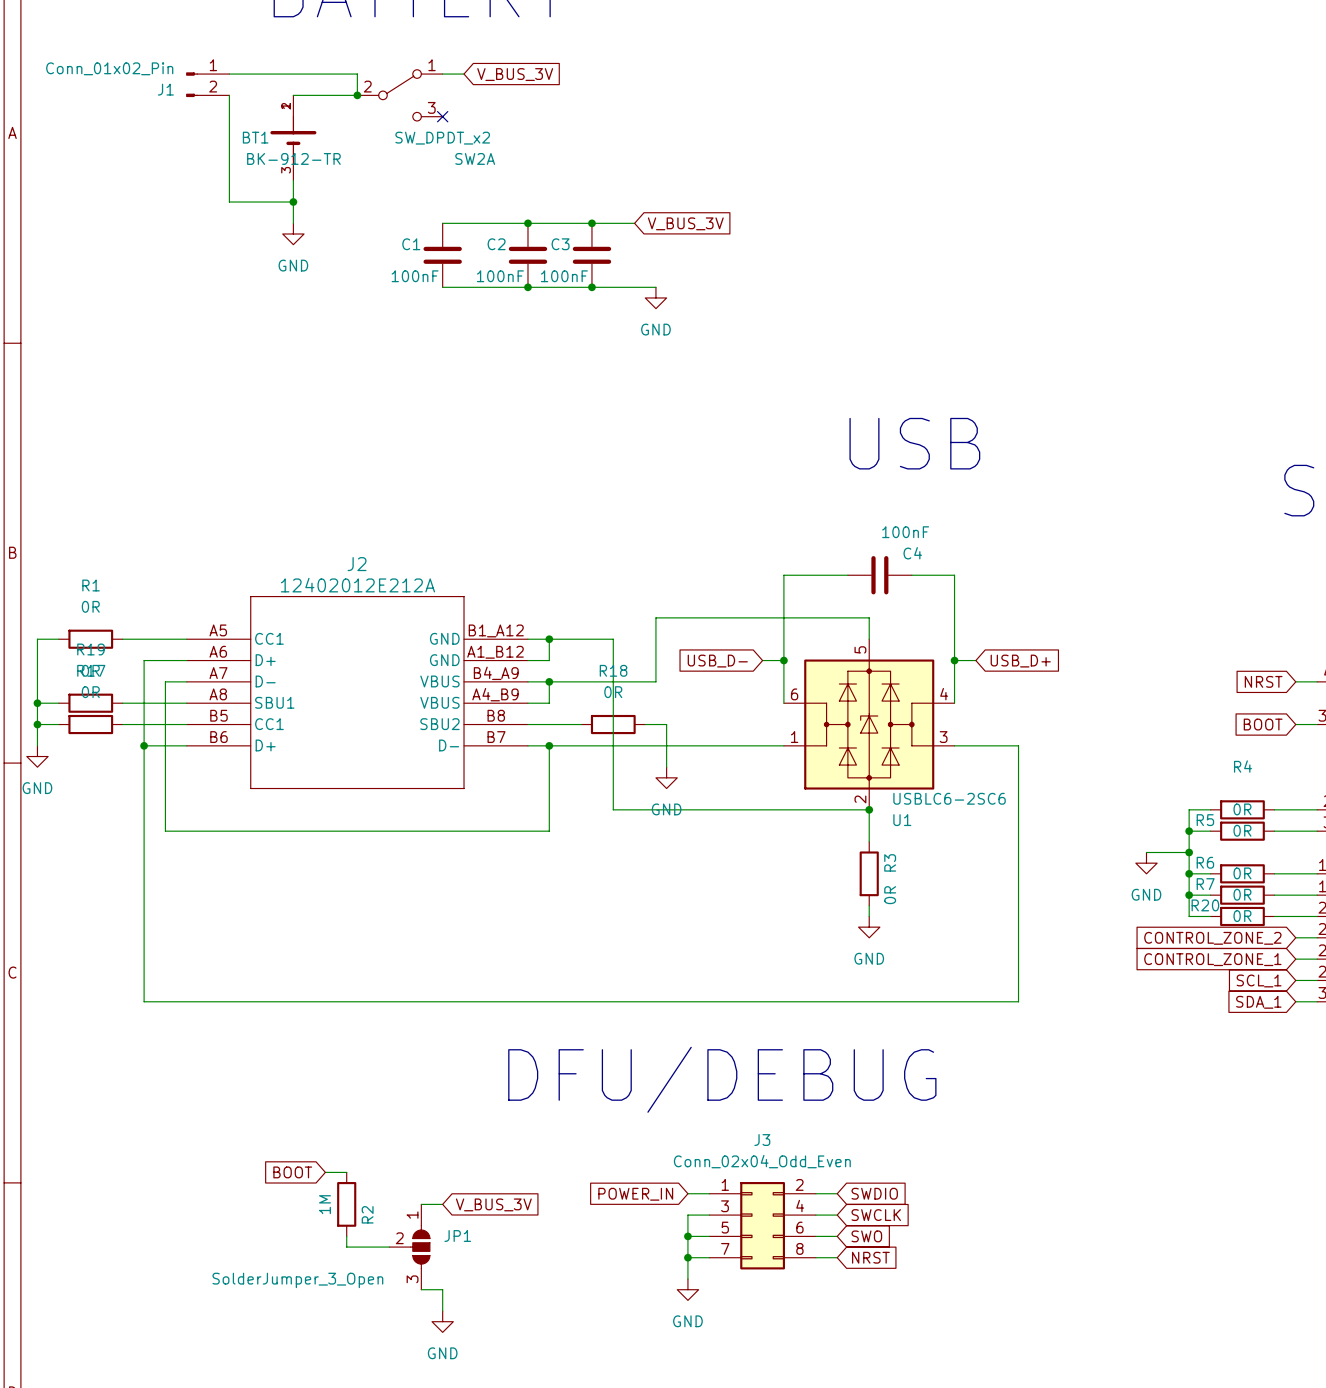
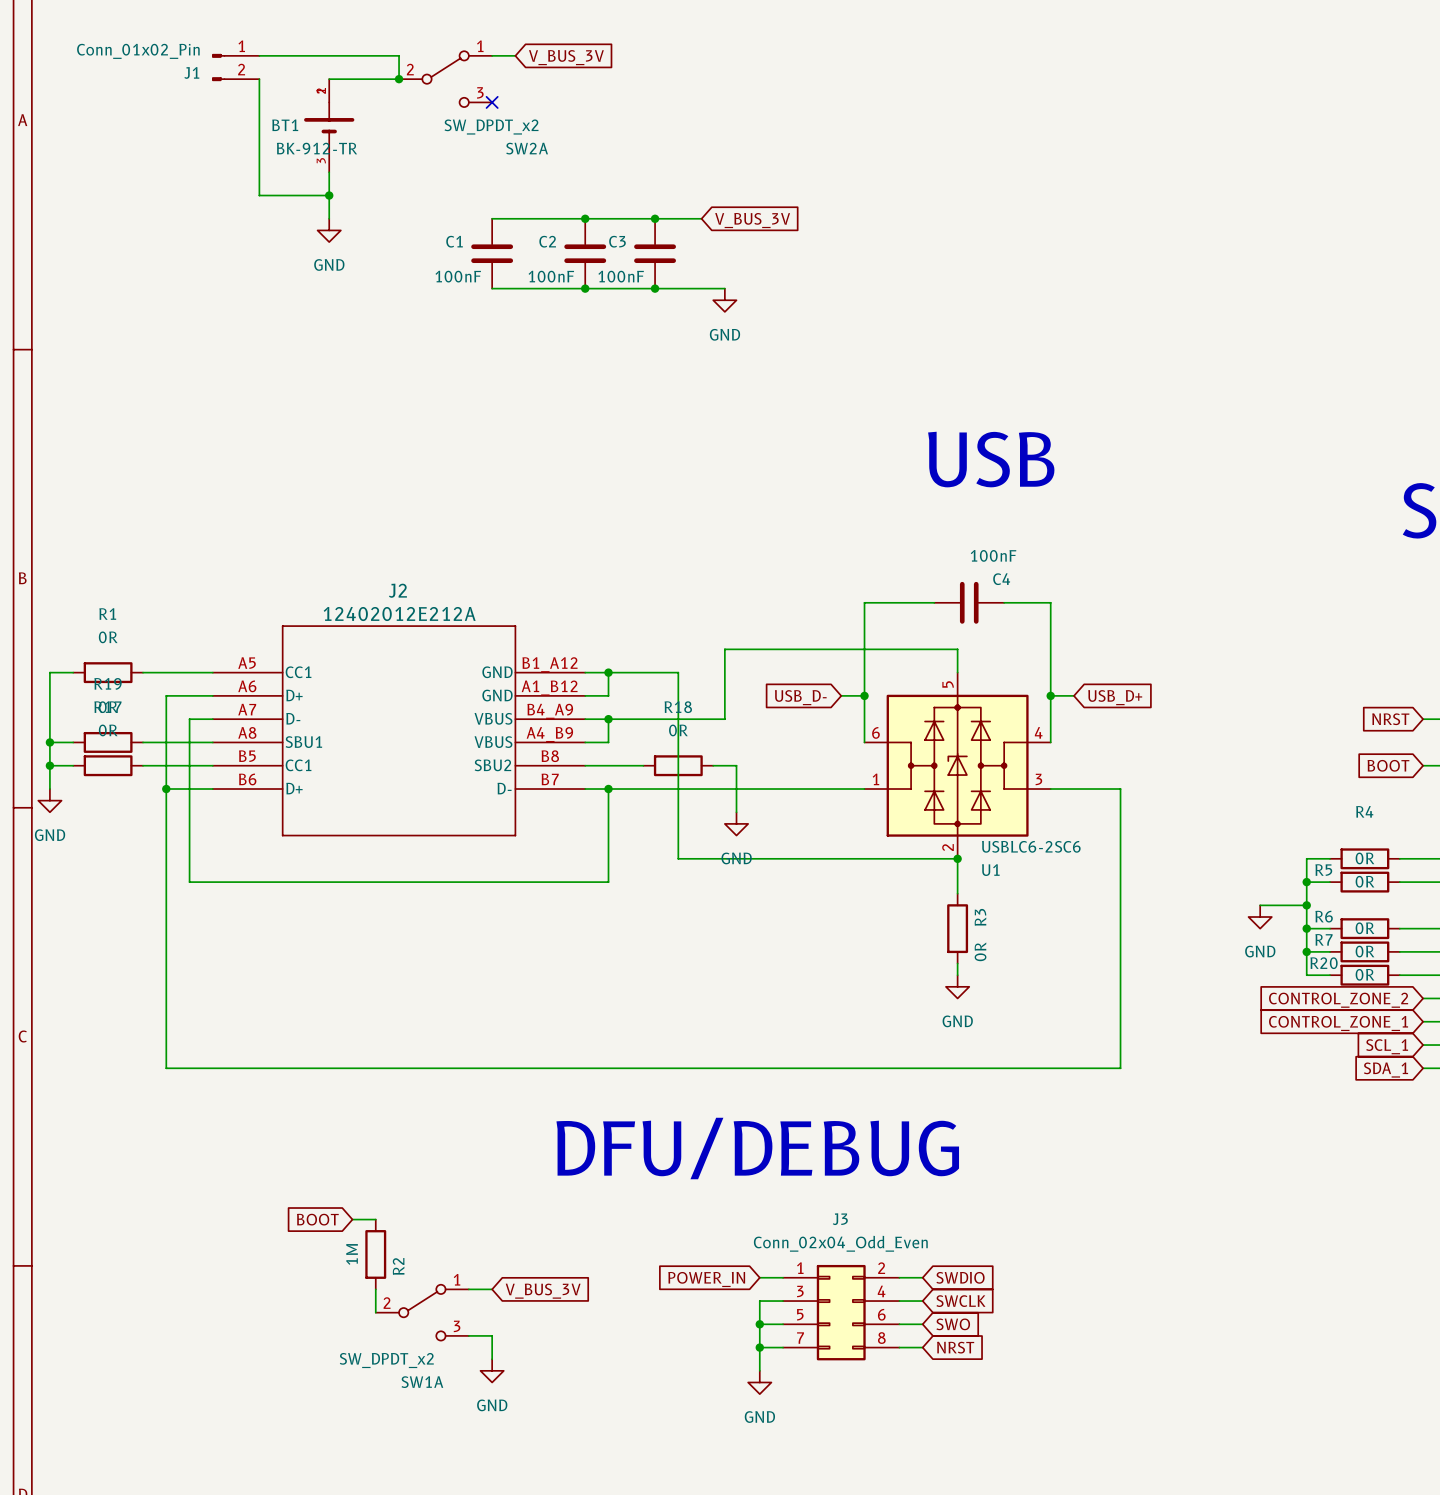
global label position: BOOT (292, 1172) -> BOOT (317, 1219)
wire: (325, 1172) (346, 1172) -> (352, 1219) (375, 1219)
wire: none -> (375, 1289) (375, 1312)
R2 position: (346, 1204) -> (375, 1254)
SW1A: none -> SW_DPDT_x2 (422, 1312)
wire: (346, 1236) (346, 1247) (389, 1247) -> none
JP1: SolderJumper_3_Open (409, 1247) -> none
wire: (421, 1289) (442, 1289) (442, 1311) -> (468, 1335) (492, 1335) (492, 1359)
power symbol position: GND (442, 1321) -> GND (492, 1370)

